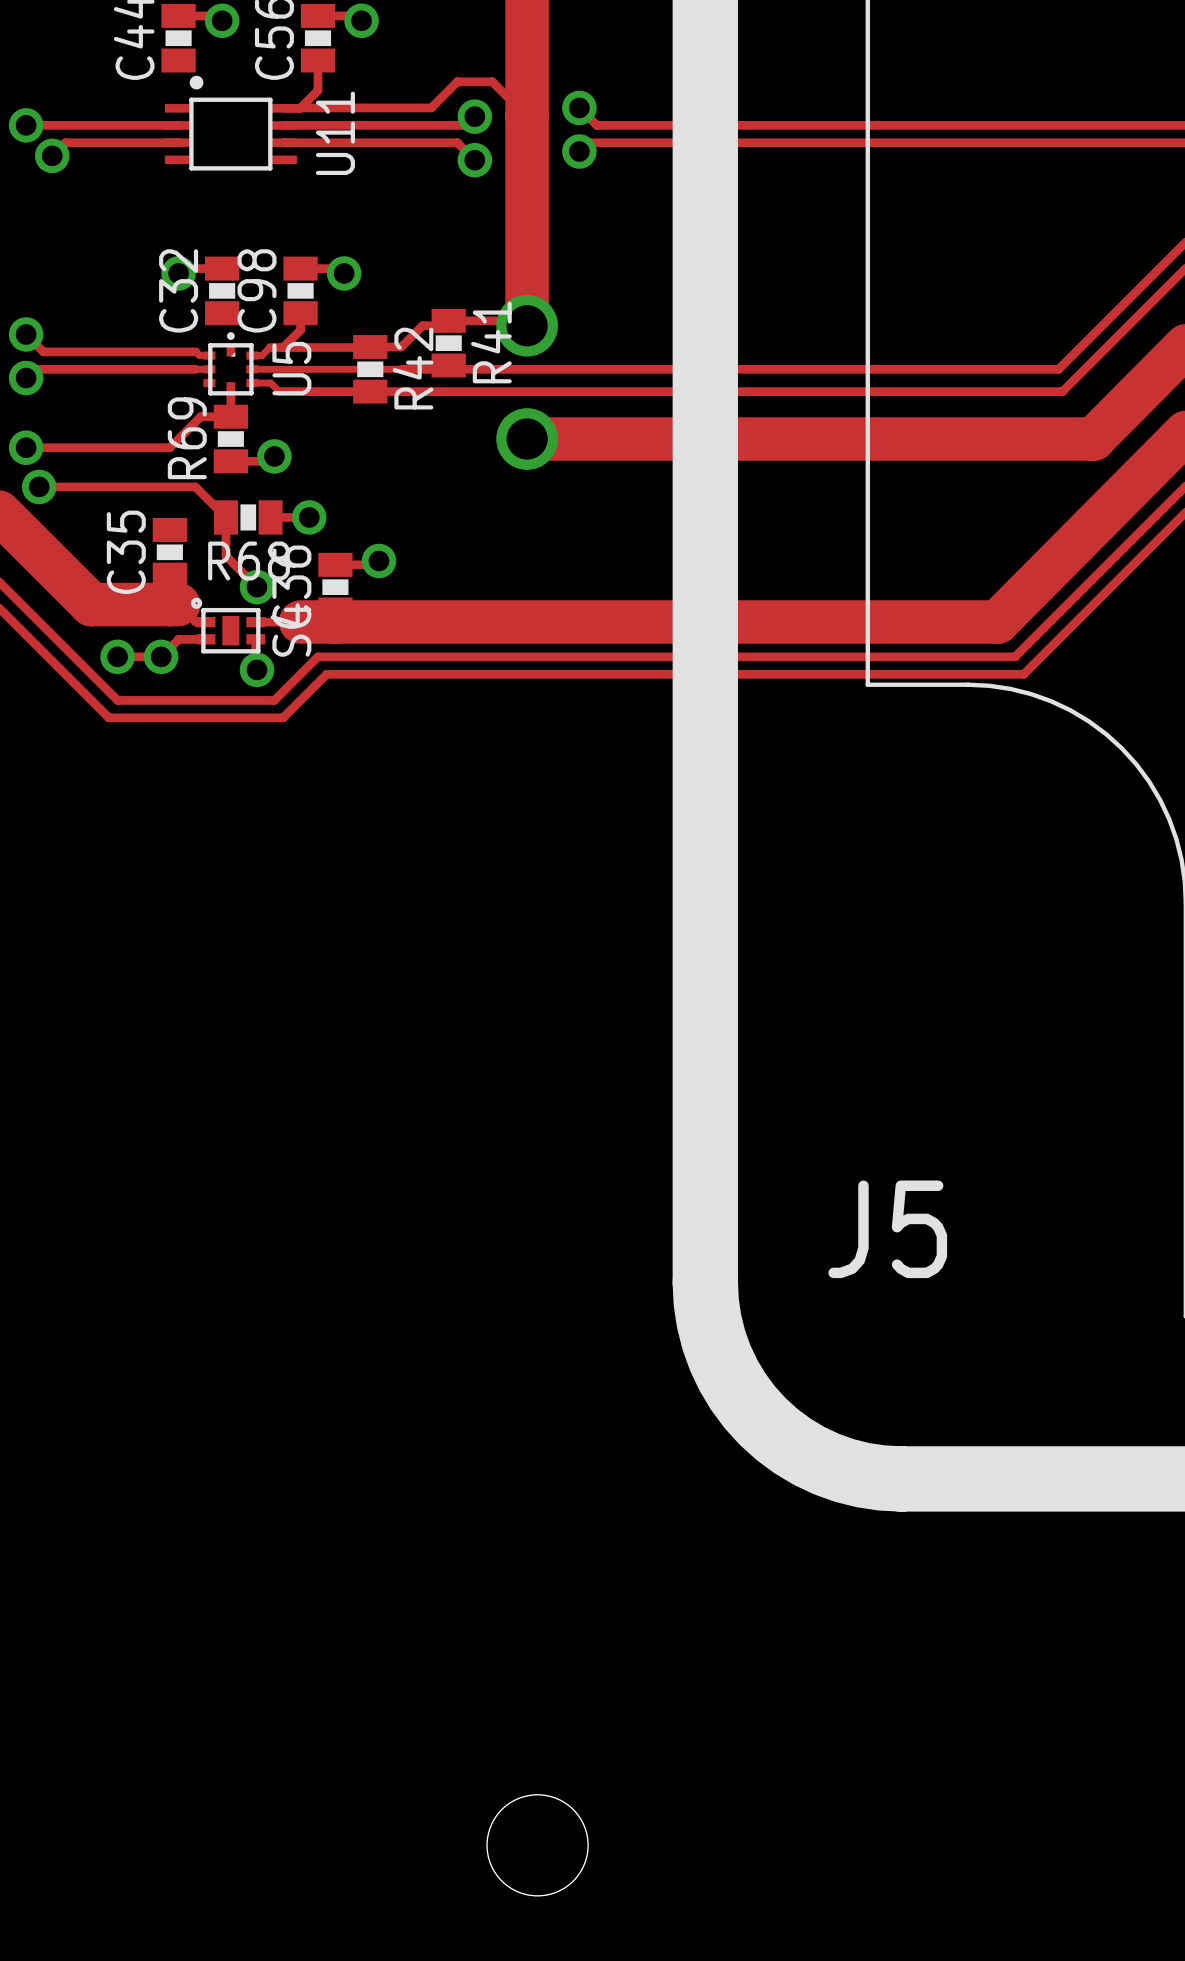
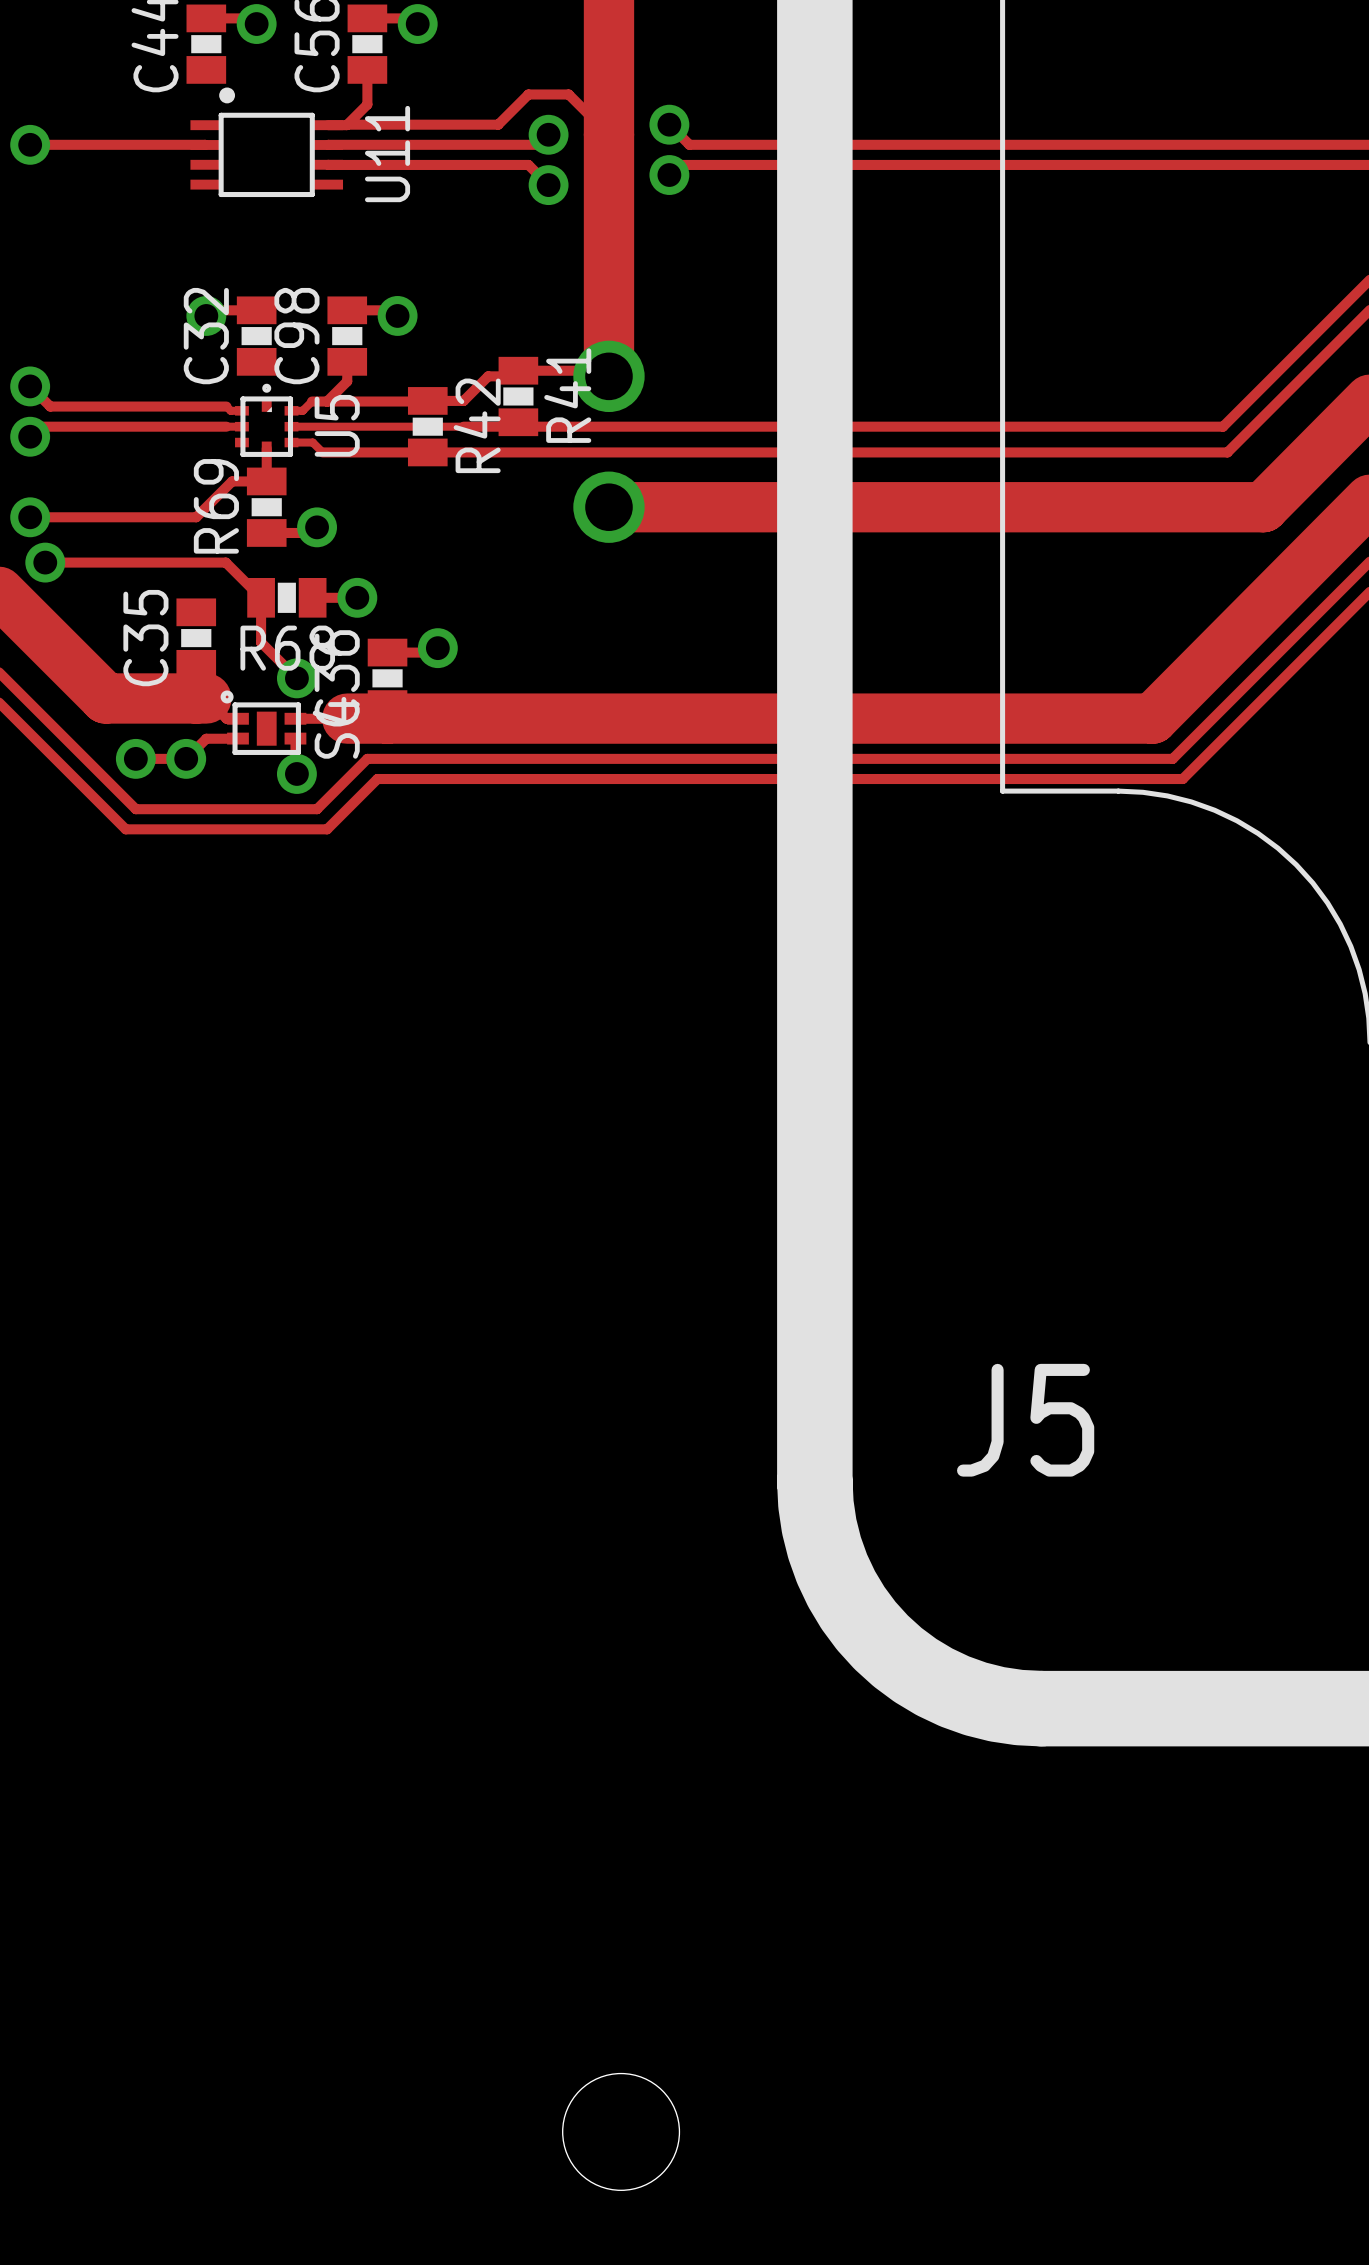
track: (177, 142) (65, 142) (52, 155) -> none
via: (52, 155) -> none

